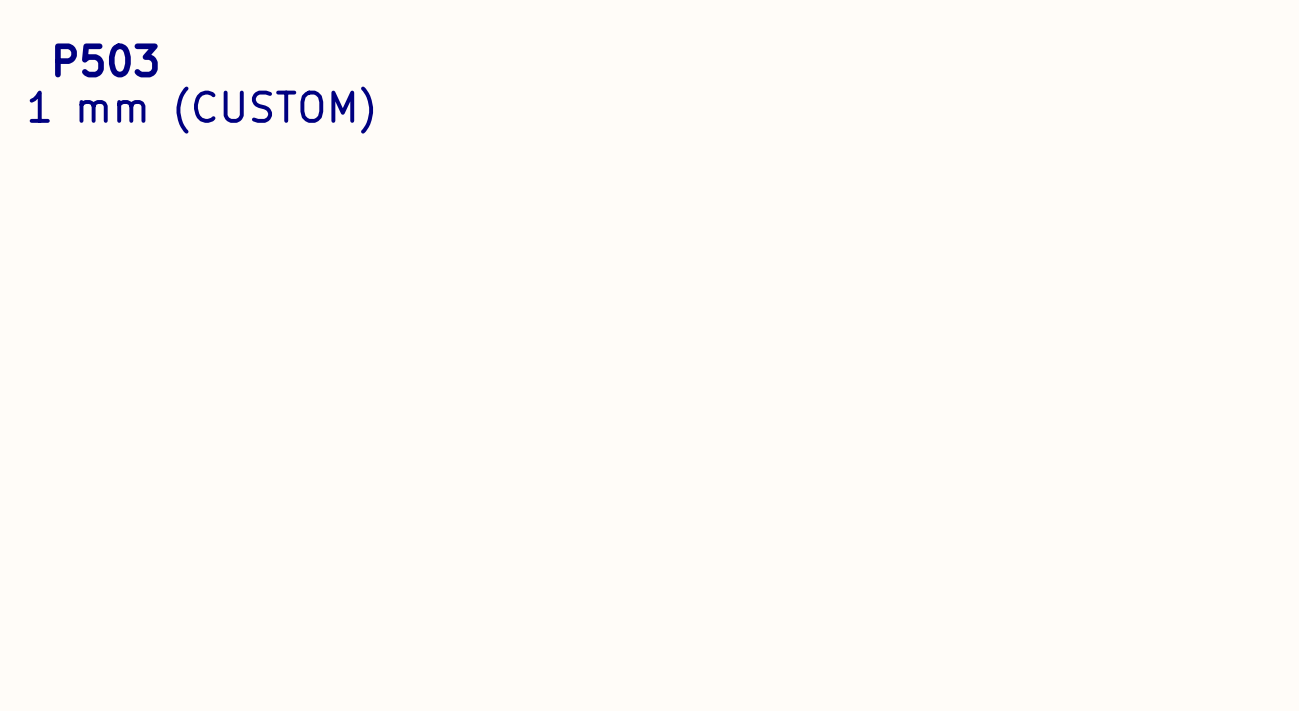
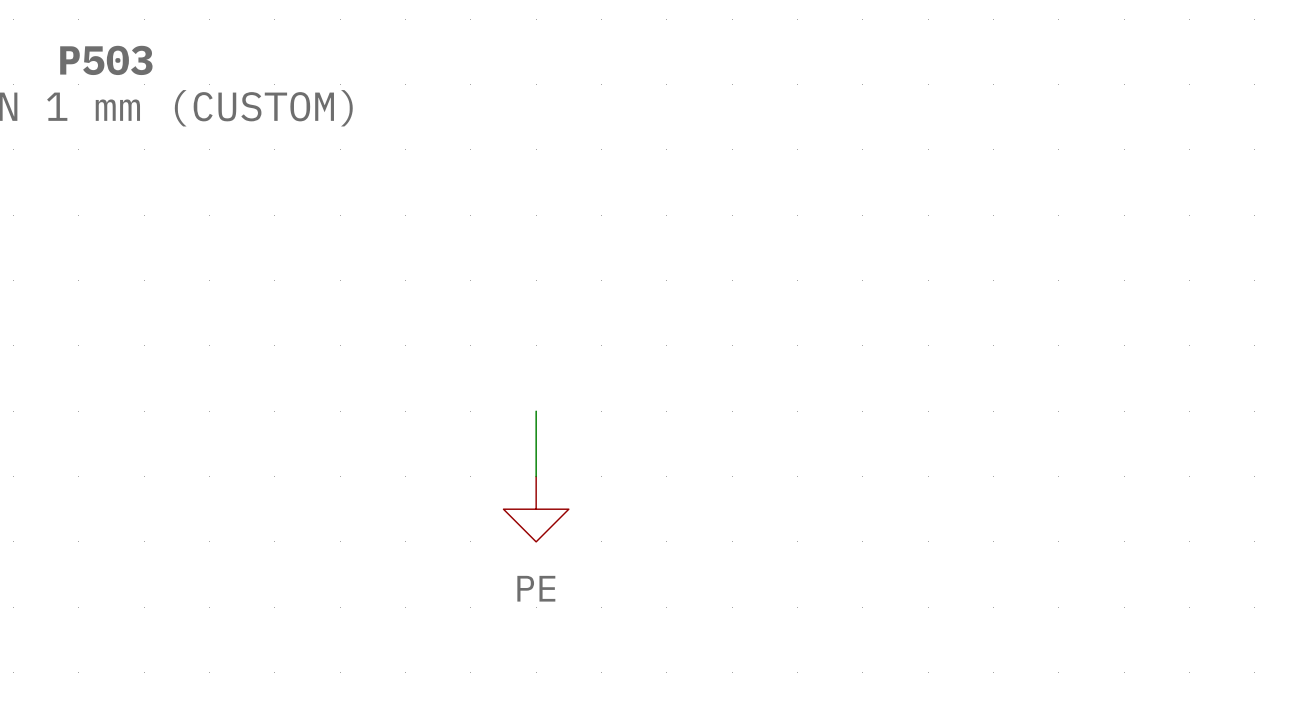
wire: none -> (536, 411) (536, 476)
power symbol: none -> PE (536, 509)

